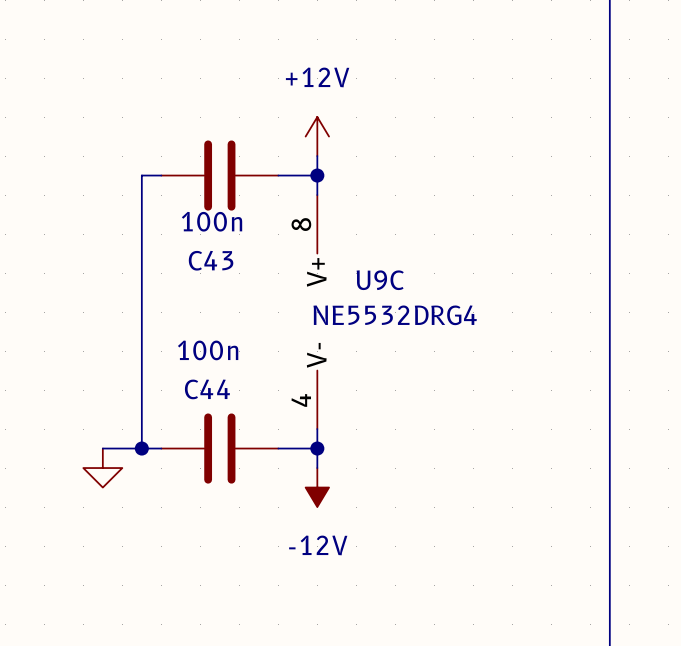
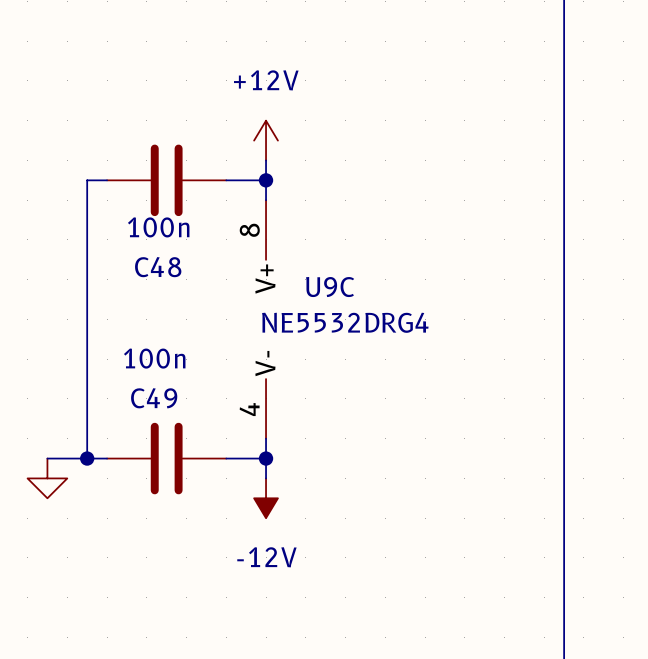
C43 name: C43 (211, 260) -> C48 (158, 267)
C44 name: C44 (207, 389) -> C49 (154, 398)

